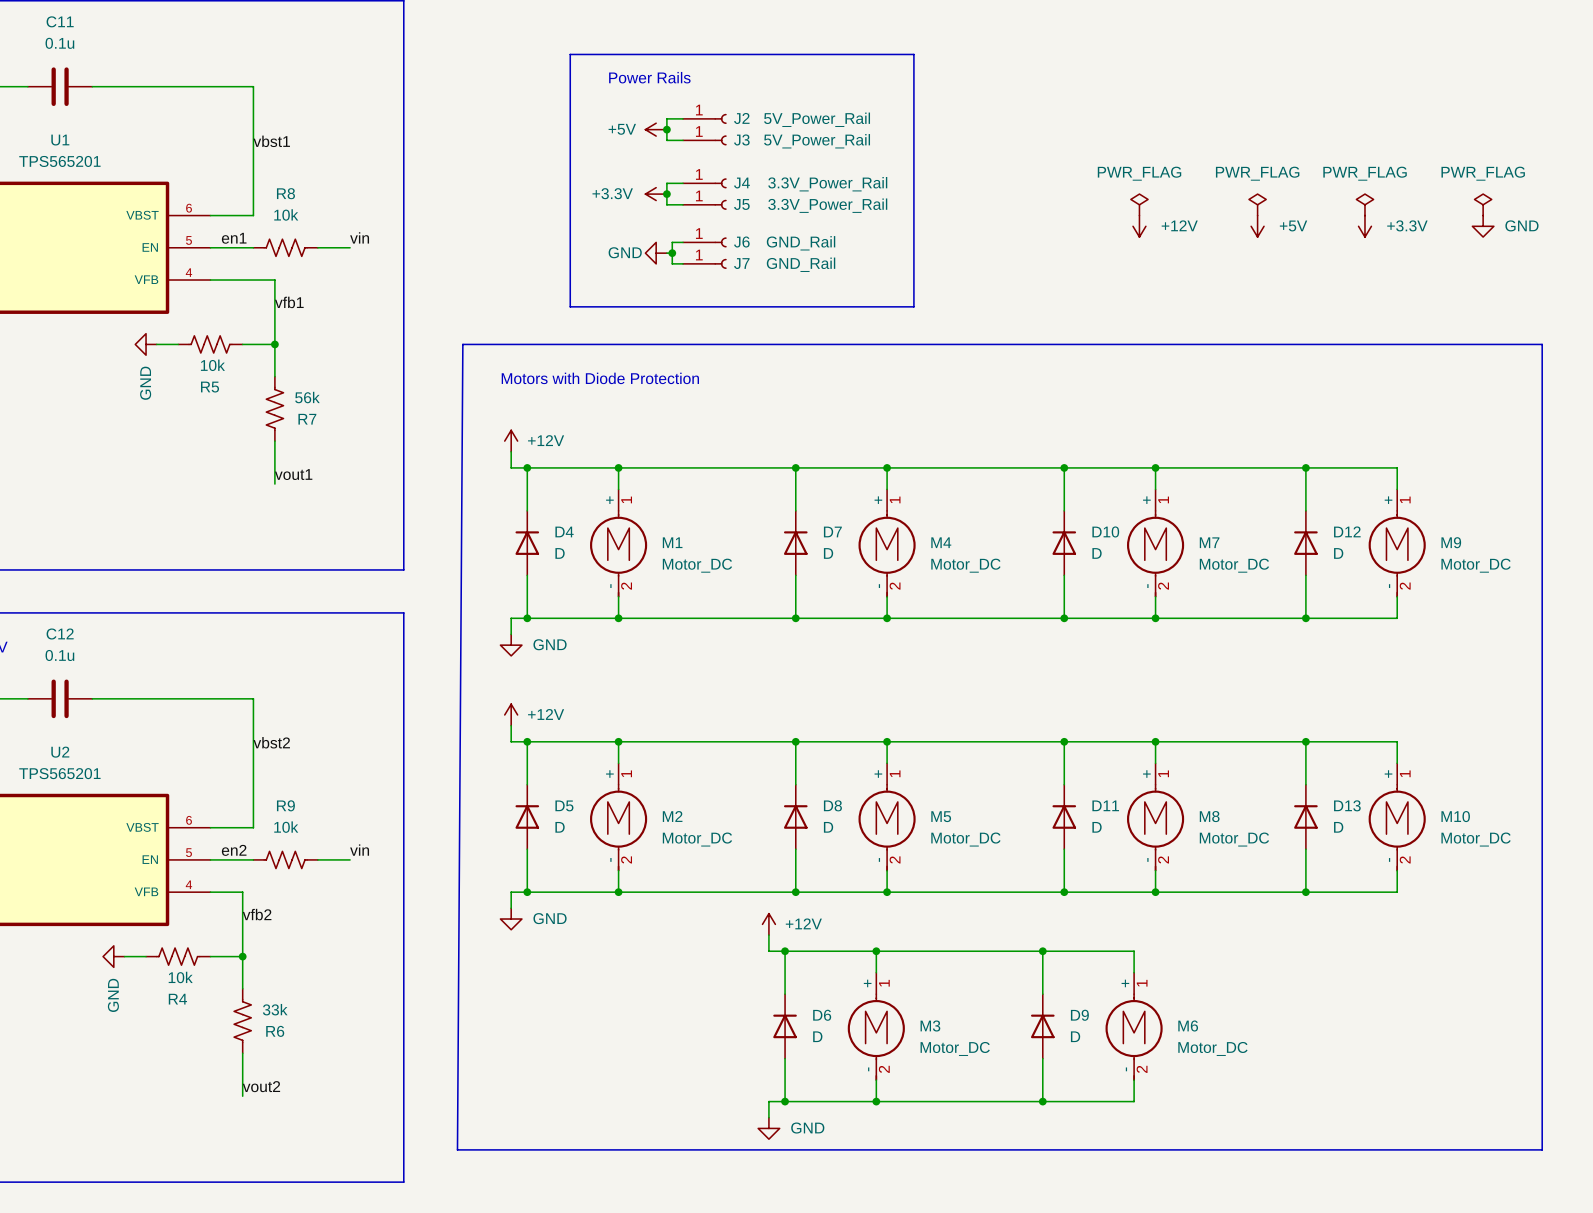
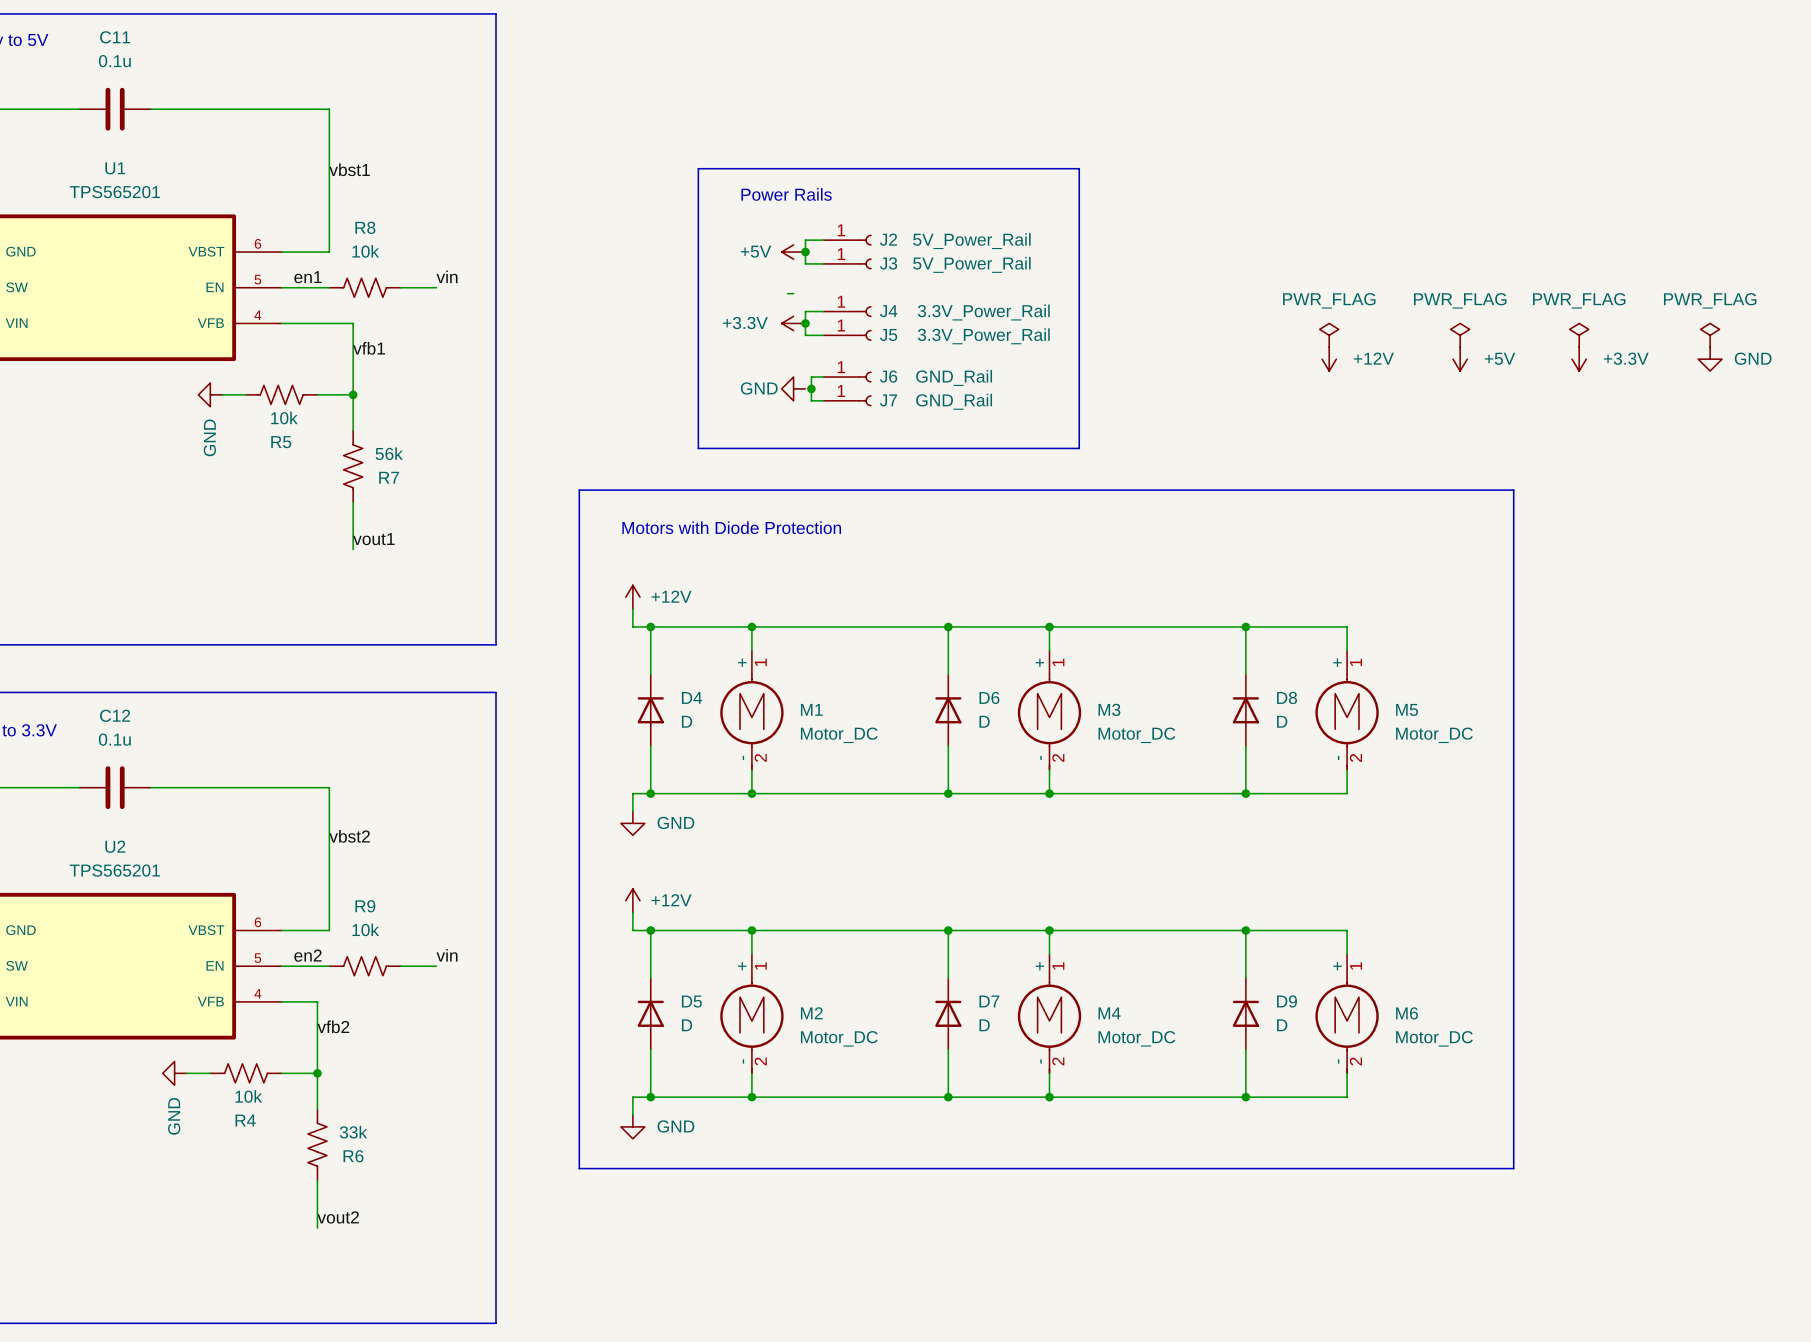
line: (570, 54) (913, 54) (913, 306) (570, 306) (570, 54) -> (698, 168) (1079, 168) (1079, 448) (698, 448) (698, 168)
text position: Power Rails (649, 77) -> Power Rails (786, 194)
wire: (683, 118) (666, 118) (666, 140) (683, 140) -> (823, 240) (805, 240) (805, 263) (823, 263)
J2 position: (704, 118) -> (847, 240)
power symbol position: +5V (656, 129) -> +5V (793, 252)
junction: (666, 129) -> none
J3 position: (704, 140) -> (847, 263)
wire: (683, 183) (666, 183) (666, 204) (683, 204) -> (823, 311) (805, 311) (805, 335) (823, 335)
J4 position: (704, 183) -> (847, 311)
power symbol position: +3.3V (656, 194) -> +3.3V (793, 323)
junction: (666, 194) -> none
J5 position: (704, 204) -> (847, 335)
power symbol: PWR_FLAG (1139, 204) -> none
power symbol: PWR_FLAG (1257, 204) -> none
power symbol: PWR_FLAG (1364, 204) -> none
power symbol: PWR_FLAG (1483, 204) -> none
junction: none -> (805, 252)
power symbol position: +12V (1139, 226) -> +12V (1329, 359)
power symbol position: +5V (1257, 226) -> +5V (1460, 359)
power symbol position: +3.3V (1364, 226) -> +3.3V (1579, 359)
power symbol position: GND (1483, 226) -> GND (1710, 359)
wire: (683, 242) (672, 242) (672, 263) (683, 263) -> (823, 377) (811, 377) (811, 400) (823, 400)
J6 position: (704, 242) -> (847, 377)
power symbol position: GND (656, 253) -> GND (793, 388)
junction: (672, 253) -> none
J7 position: (704, 263) -> (847, 400)
junction: none -> (805, 323)
power symbol: none -> PWR_FLAG (1329, 335)
power symbol: none -> PWR_FLAG (1460, 335)
power symbol: none -> PWR_FLAG (1579, 335)
power symbol: none -> PWR_FLAG (1710, 335)
junction: none -> (811, 388)
line: (462, 344) (1542, 344) (1542, 1149) (457, 1149) (462, 344) -> (579, 490) (579, 1168) (1513, 1168) (1513, 490) (579, 490)
text position: Motors with Diode Protection (600, 378) -> Motors with Diode Protection (731, 527)
power symbol position: +12V (511, 441) -> +12V (632, 597)
wire: (511, 451) (511, 467) (1397, 467) (1397, 489) -> none
wire: (527, 467) (527, 510) -> (650, 626) (650, 674)
junction: (527, 467) -> none
wire: (618, 467) (618, 489) -> (751, 626) (751, 650)
junction: (618, 467) -> none
wire: (795, 467) (795, 510) -> (948, 626) (948, 674)
junction: (795, 467) -> none
wire: (887, 467) (887, 489) -> (1049, 626) (1049, 650)
junction: (887, 467) -> none
wire: (1064, 467) (1064, 510) -> (1245, 626) (1245, 674)
junction: (1064, 467) -> none
wire: (1155, 467) (1155, 489) -> none
junction: (1155, 467) -> none
wire: (1305, 467) (1305, 510) -> none
junction: (1305, 467) -> none
wire: none -> (632, 609) (632, 626) (1347, 626) (1347, 650)
D4 position: (527, 543) -> (650, 710)
M1 position: (618, 543) -> (751, 710)
D7 position: (795, 543) -> (948, 1013)
M4 position: (887, 543) -> (1049, 1013)
D10: D (1064, 543) -> none
M7: Motor_DC (1155, 543) -> none
D12: D (1305, 543) -> none
M9: Motor_DC (1397, 543) -> none
junction: none -> (650, 626)
junction: none -> (751, 626)
junction: none -> (948, 626)
junction: none -> (1049, 626)
junction: none -> (1245, 626)
wire: (527, 575) (527, 618) -> (650, 746) (650, 793)
wire: (795, 575) (795, 618) -> (948, 746) (948, 793)
wire: (1064, 575) (1064, 618) -> (1245, 746) (1245, 793)
wire: (1305, 575) (1305, 618) -> none
wire: (618, 596) (618, 618) -> (751, 769) (751, 793)
wire: (887, 596) (887, 618) -> (1049, 769) (1049, 793)
wire: (1155, 596) (1155, 618) -> none
wire: (1397, 596) (1397, 618) (511, 618) (511, 634) -> none
junction: (527, 618) -> none
junction: (618, 618) -> none
junction: (795, 618) -> none
junction: (887, 618) -> none
junction: (1064, 618) -> none
junction: (1155, 618) -> none
junction: (1305, 618) -> none
power symbol position: GND (511, 645) -> GND (632, 823)
wire: none -> (1347, 769) (1347, 793) (632, 793) (632, 811)
power symbol position: +12V (511, 714) -> +12V (632, 900)
wire: (511, 725) (511, 741) (1397, 741) (1397, 763) -> none
wire: (527, 741) (527, 784) -> (650, 930) (650, 978)
junction position: (527, 741) -> (650, 793)
wire: (618, 741) (618, 763) -> (751, 930) (751, 954)
junction position: (618, 741) -> (751, 793)
wire: (795, 741) (795, 784) -> (948, 930) (948, 978)
junction position: (795, 741) -> (948, 793)
wire: (887, 741) (887, 763) -> (1049, 930) (1049, 954)
junction position: (887, 741) -> (1049, 793)
wire: (1064, 741) (1064, 784) -> (1245, 930) (1245, 978)
junction position: (1064, 741) -> (1245, 793)
wire: (1155, 741) (1155, 763) -> none
junction: (1155, 741) -> none
wire: (1305, 741) (1305, 784) -> none
junction: (1305, 741) -> none
wire: none -> (632, 912) (632, 930) (1347, 930) (1347, 954)
D5 position: (527, 816) -> (650, 1013)
M2 position: (618, 816) -> (751, 1013)
D8 position: (795, 816) -> (1245, 710)
M5 position: (887, 816) -> (1347, 710)
D11: D (1064, 816) -> none
M8: Motor_DC (1155, 816) -> none
D13: D (1305, 816) -> none
M10: Motor_DC (1397, 816) -> none
junction: none -> (650, 930)
junction: none -> (751, 930)
junction: none -> (948, 930)
junction: none -> (1049, 930)
junction: none -> (1245, 930)
wire: (527, 849) (527, 892) -> (650, 1049) (650, 1097)
wire: (795, 849) (795, 892) -> (948, 1049) (948, 1097)
wire: (1064, 849) (1064, 892) -> (1245, 1049) (1245, 1097)
wire: (1305, 849) (1305, 892) -> none
wire: (618, 870) (618, 892) -> (751, 1073) (751, 1097)
wire: (887, 870) (887, 892) -> (1049, 1073) (1049, 1097)
wire: (1155, 870) (1155, 892) -> none
wire: (1397, 870) (1397, 892) (511, 892) (511, 908) -> none
junction: (527, 892) -> none
junction: (618, 892) -> none
junction: (795, 892) -> none
junction: (887, 892) -> none
junction: (1064, 892) -> none
junction: (1155, 892) -> none
junction: (1305, 892) -> none
power symbol position: GND (511, 919) -> GND (632, 1126)
power symbol: +12V (768, 924) -> none
wire: (768, 935) (768, 951) (1134, 951) (1134, 972) -> none
wire: (785, 951) (785, 994) -> none
junction: (785, 951) -> none
wire: (876, 951) (876, 972) -> none
junction: (876, 951) -> none
wire: (1042, 951) (1042, 994) -> none
junction: (1042, 951) -> none
wire: none -> (1347, 1073) (1347, 1097) (632, 1097) (632, 1115)
junction: none -> (650, 1097)
junction: none -> (751, 1097)
junction: none -> (948, 1097)
junction: none -> (1049, 1097)
junction: none -> (1245, 1097)
D6 position: (785, 1026) -> (948, 710)
M3 position: (876, 1026) -> (1049, 710)
D9 position: (1042, 1026) -> (1245, 1013)
M6 position: (1134, 1026) -> (1347, 1013)
wire: (785, 1058) (785, 1101) -> none
wire: (1042, 1058) (1042, 1101) -> none
wire: (876, 1080) (876, 1101) -> none
wire: (1134, 1080) (1134, 1101) (768, 1101) (768, 1117) -> none
junction: (785, 1101) -> none
junction: (876, 1101) -> none
junction: (1042, 1101) -> none
power symbol: GND (768, 1128) -> none

